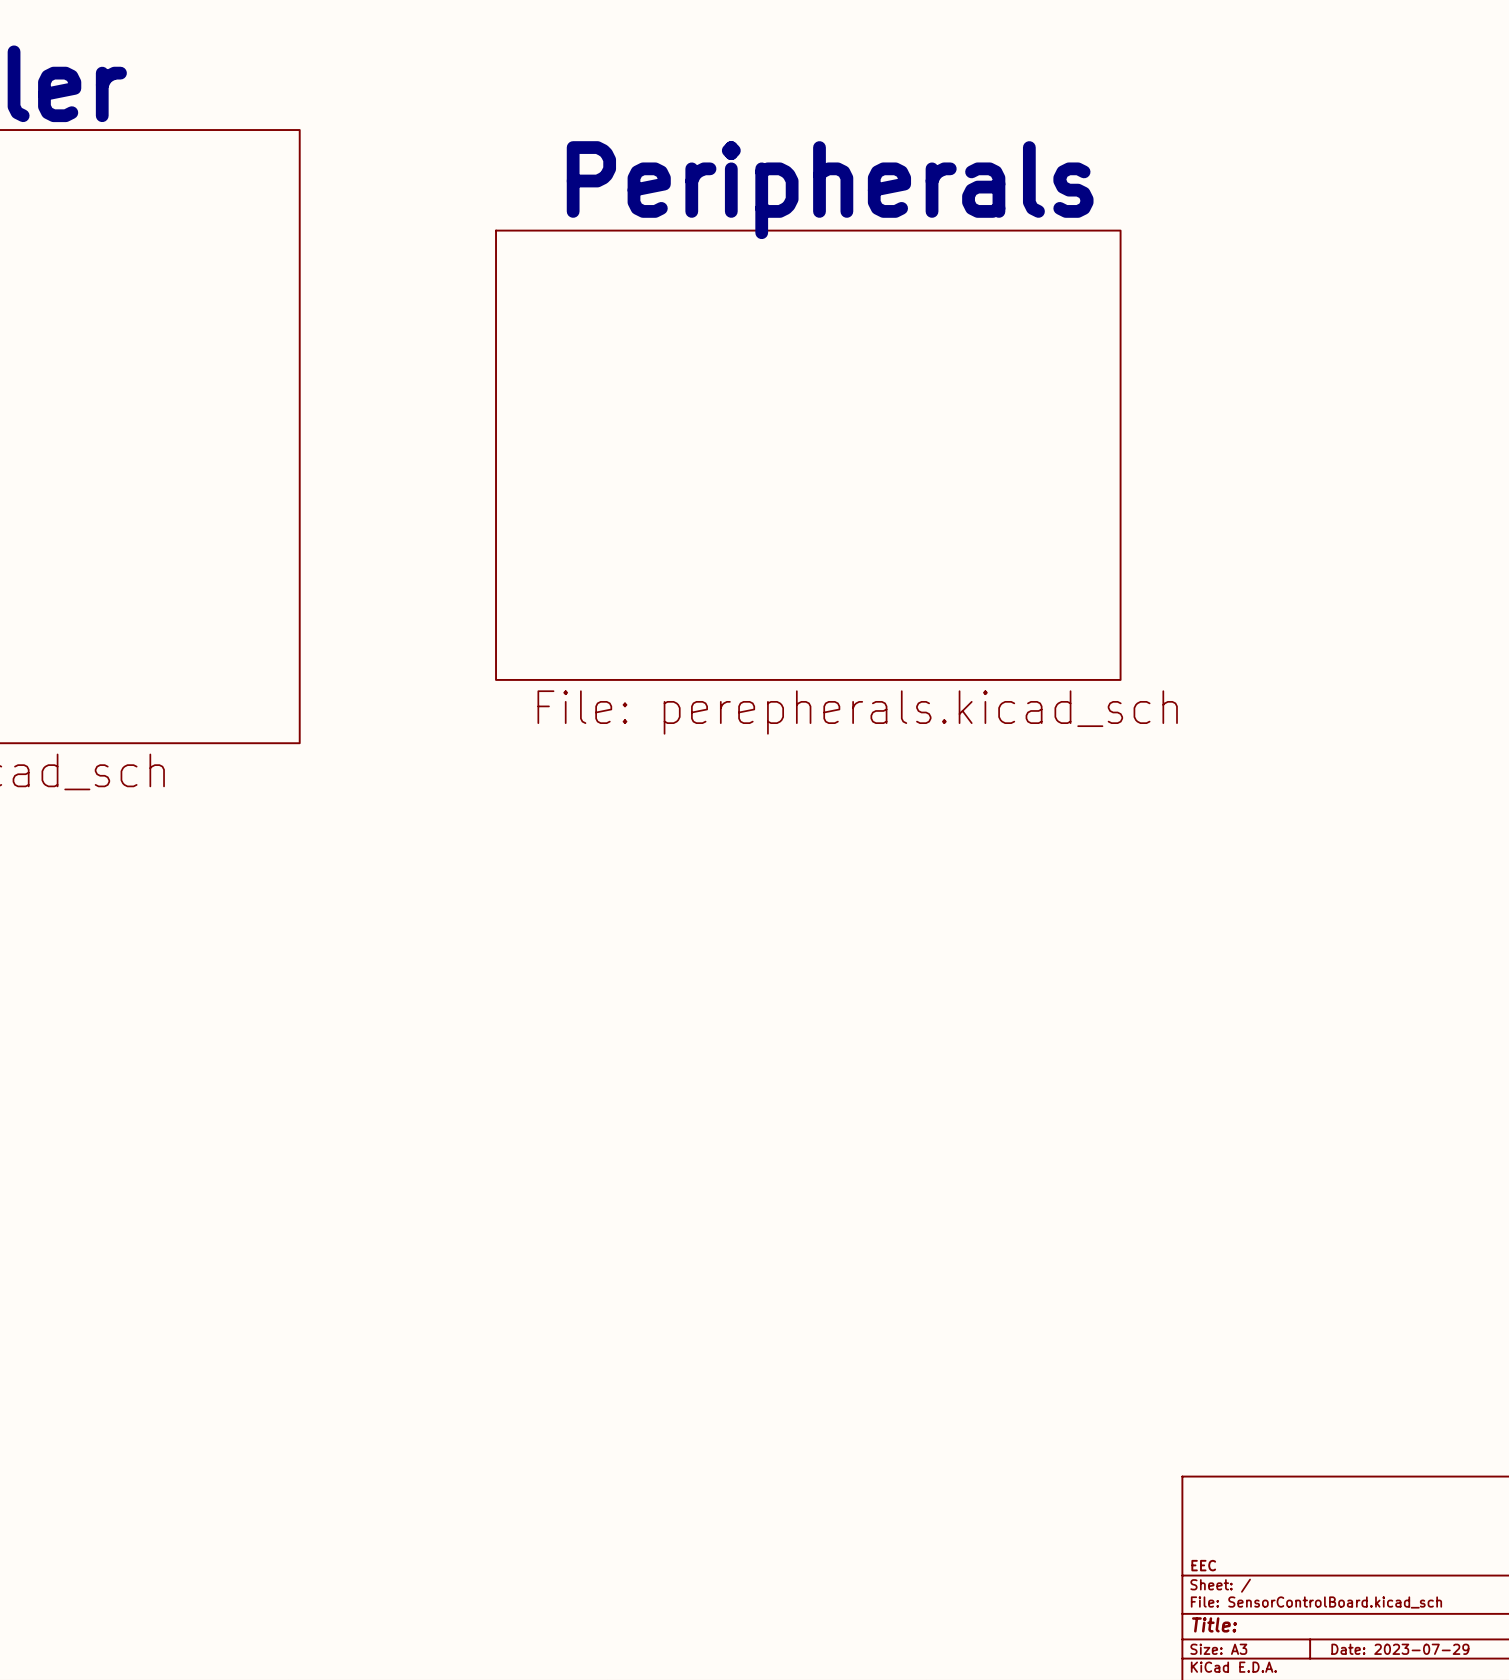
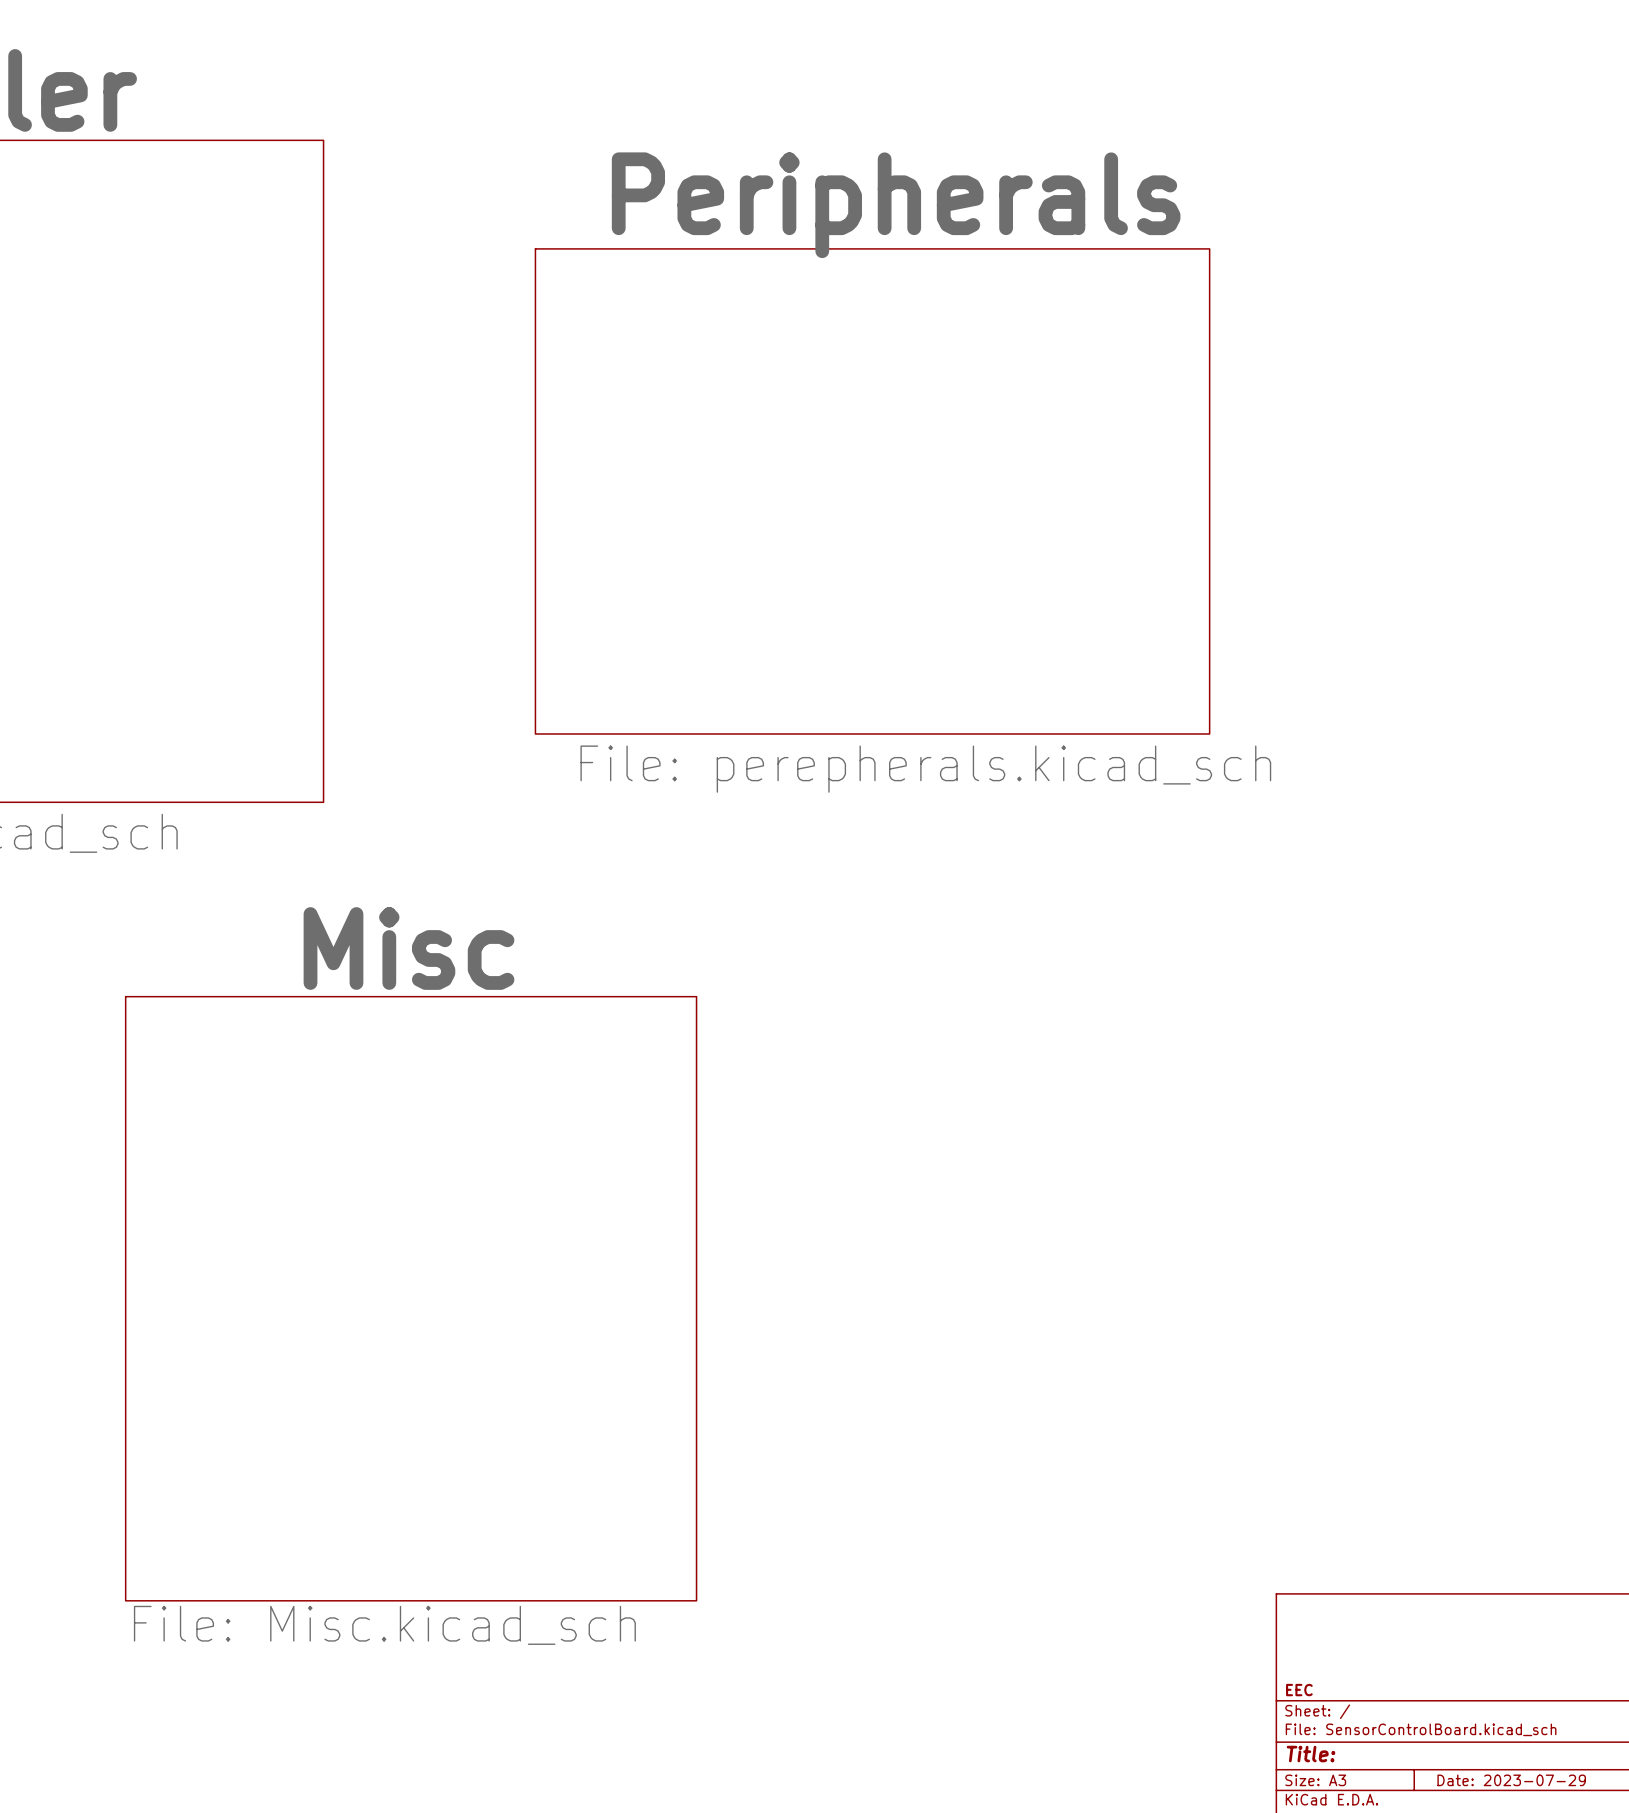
sheet Misc: none -> File: Misc.kicad_sch (411, 1298)

